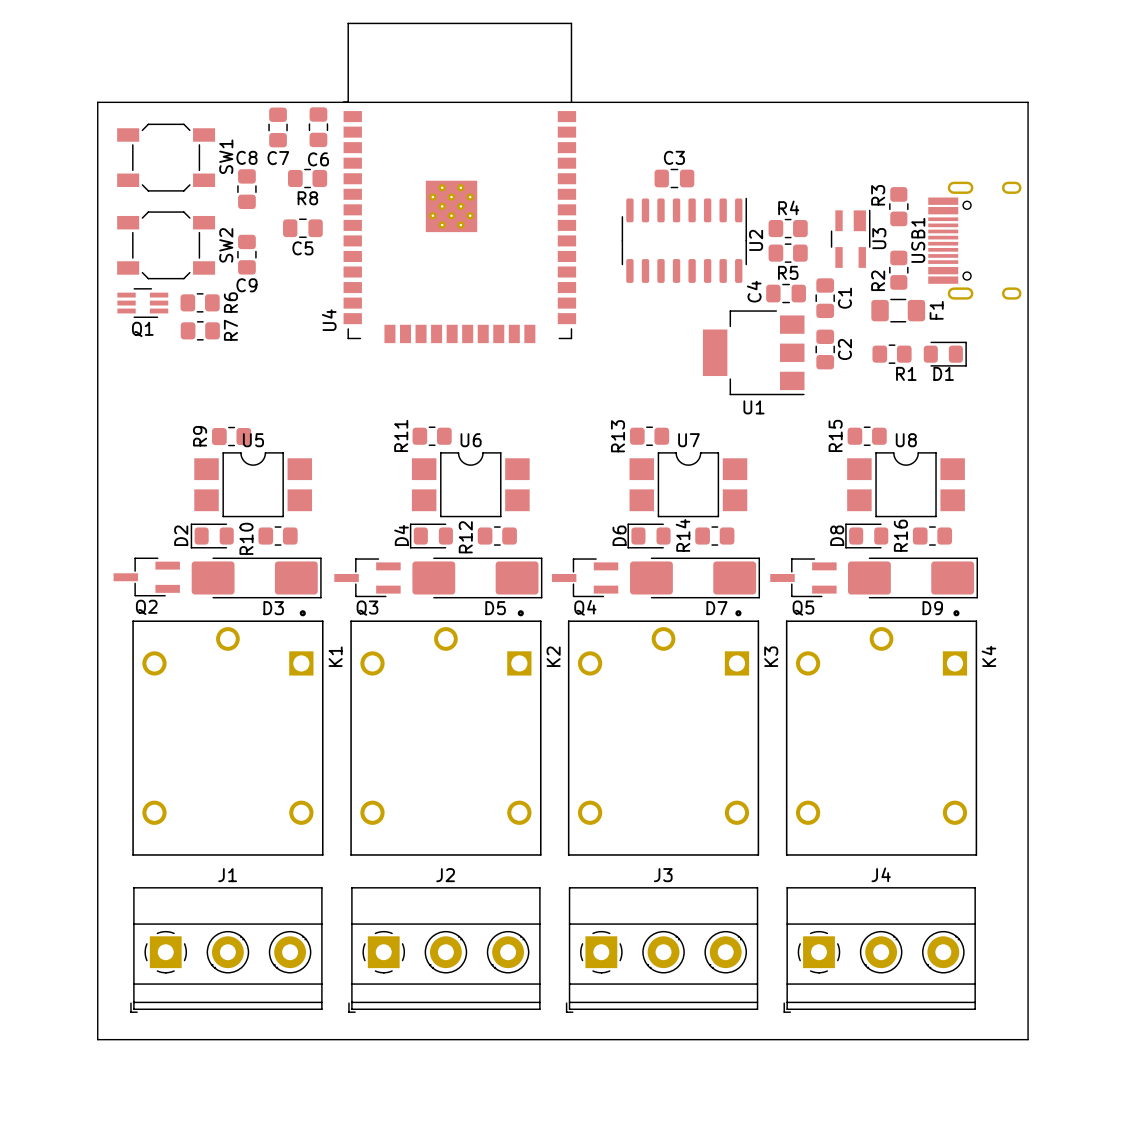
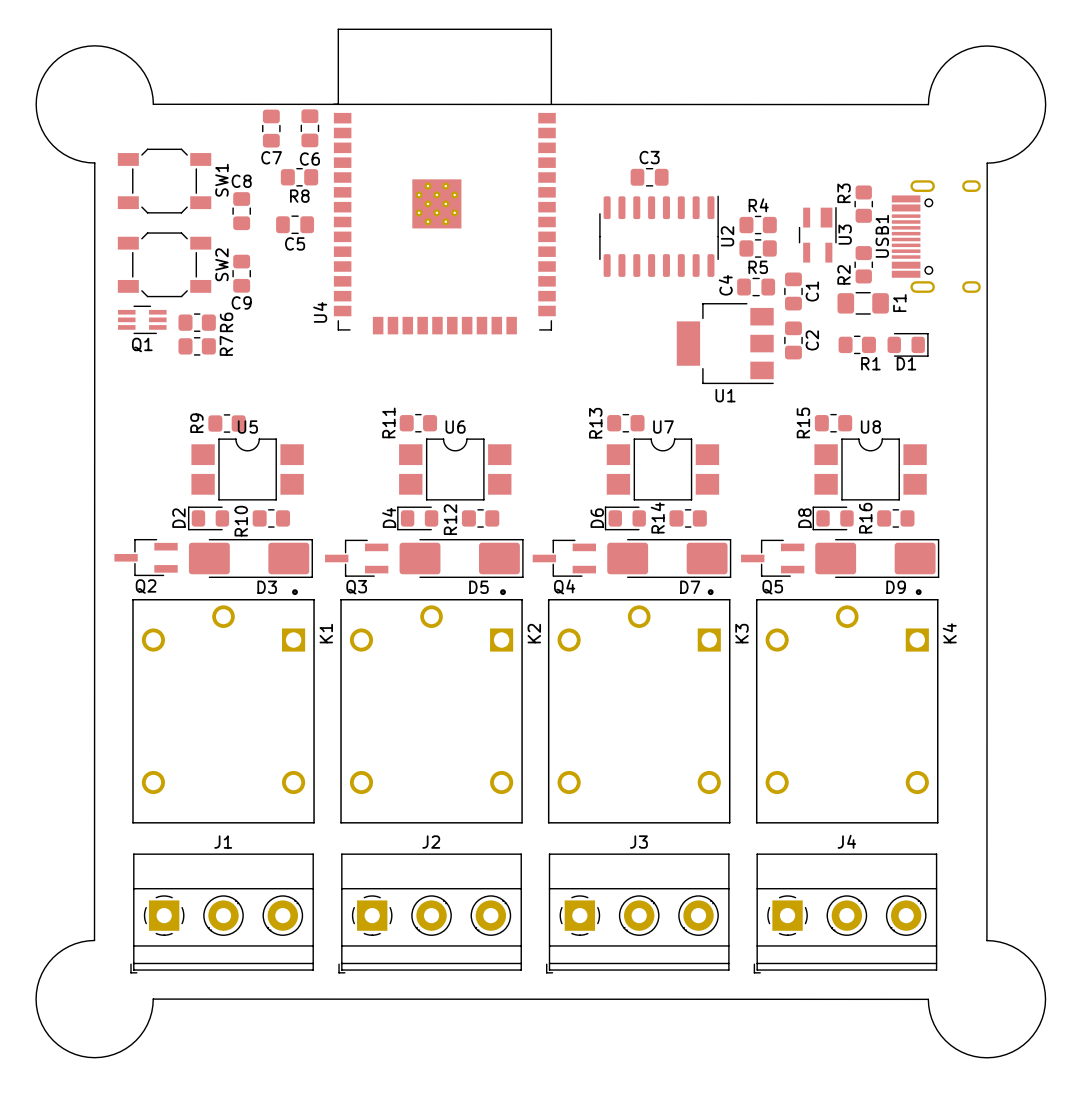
board edge: (97, 102) (1028, 102) (1028, 1039) (97, 1039) (97, 102) -> (153, 104) (150, 84) (136, 62) (120, 51) (94, 45) (75, 49) (58, 58) (41, 79) (36, 97) (37, 117) (48, 140) (69, 157) (94, 163) (94, 940) (75, 943) (58, 953) (48, 962) (39, 979) (36, 992) (37, 1012) (41, 1024) (53, 1040) (63, 1048) (81, 1056) (101, 1057) (120, 1051) (131, 1044) (144, 1030) (149, 1018) (153, 999) (928, 999) (931, 1018) (937, 1030) (950, 1045) (961, 1052) (974, 1056) (993, 1057) (1012, 1051) (1028, 1040) (1036, 1030) (1044, 1012) (1045, 992) (1039, 973) (1032, 962) (1018, 949) (1006, 943) (986, 940) (987, 163) (1000, 161) (1018, 154) (1032, 141) (1039, 129) (1045, 111) (1044, 91) (1039, 79) (1028, 63) (1018, 54) (1000, 47) (980, 46) (967, 49) (955, 54) (941, 68) (931, 85) (928, 104) (153, 104)
SW1 position: (166, 157) -> (164, 181)
C8 position: (246, 189) -> (241, 211)
SW2 position: (166, 245) -> (164, 264)
C9 position: (246, 254) -> (241, 273)
R6: (200, 302) -> none
Q1 position: (142, 303) -> (142, 319)
R7 name: R7 (230, 330) -> R6 (226, 322)
R7: none -> (197, 346)

